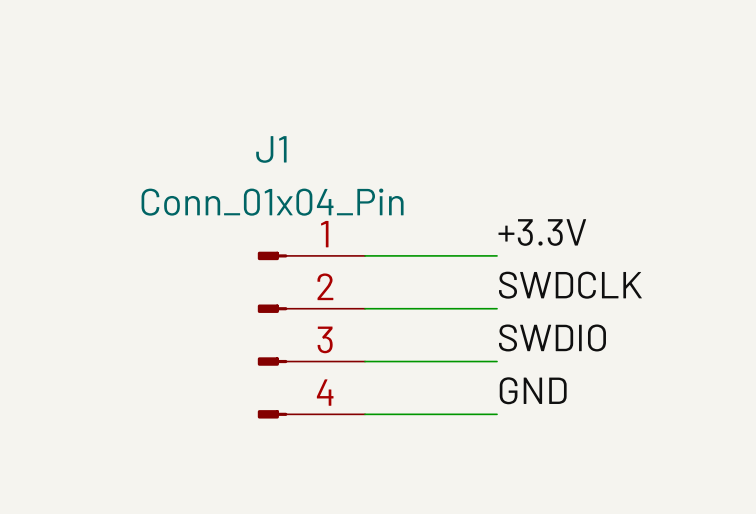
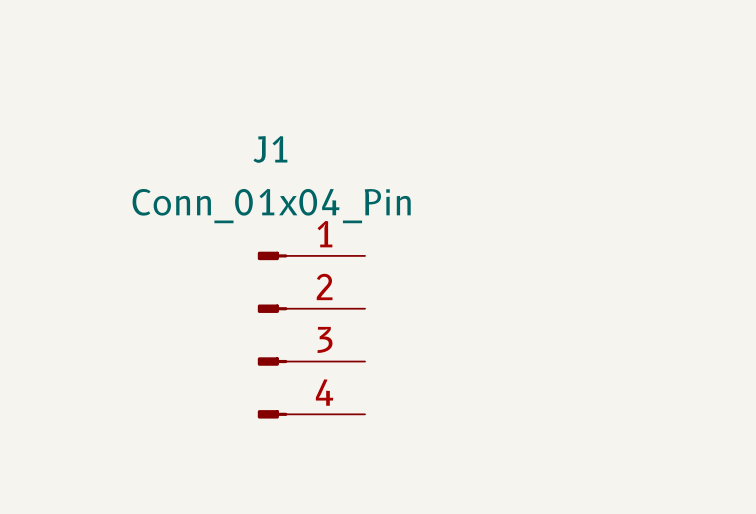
label: +3.3V (542, 232) -> none
wire: (365, 255) (497, 255) -> none
label: SWDCLK (570, 285) -> none
wire: (365, 308) (497, 308) -> none
label: SWDIO (552, 337) -> none
wire: (365, 361) (497, 361) -> none
label: GND (533, 390) -> none
wire: (365, 414) (497, 414) -> none

